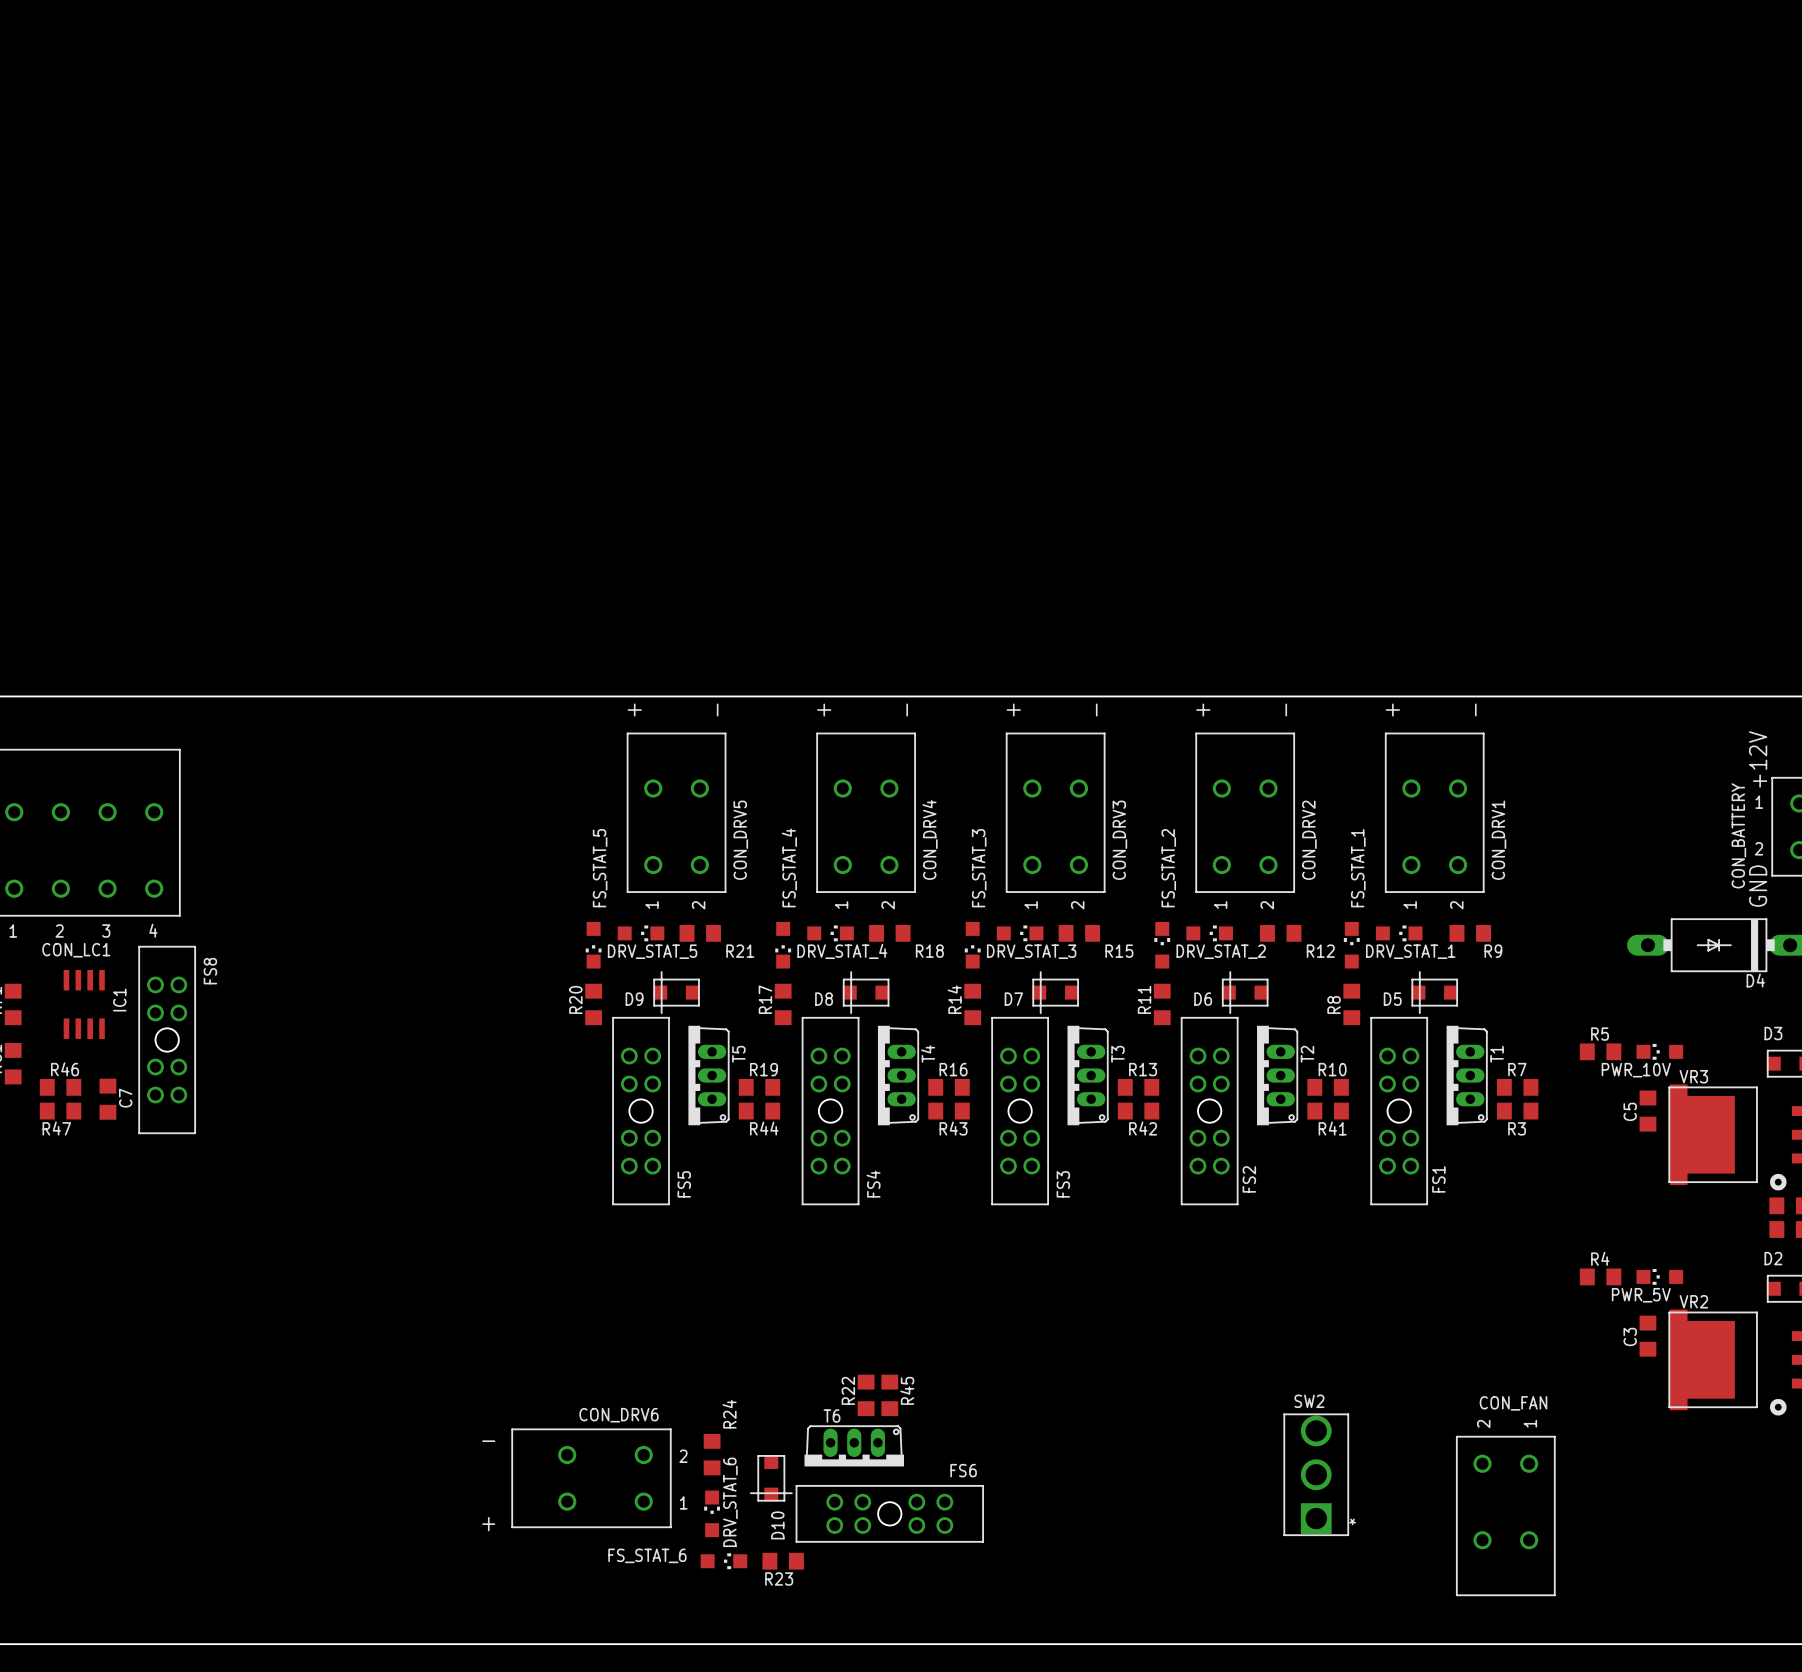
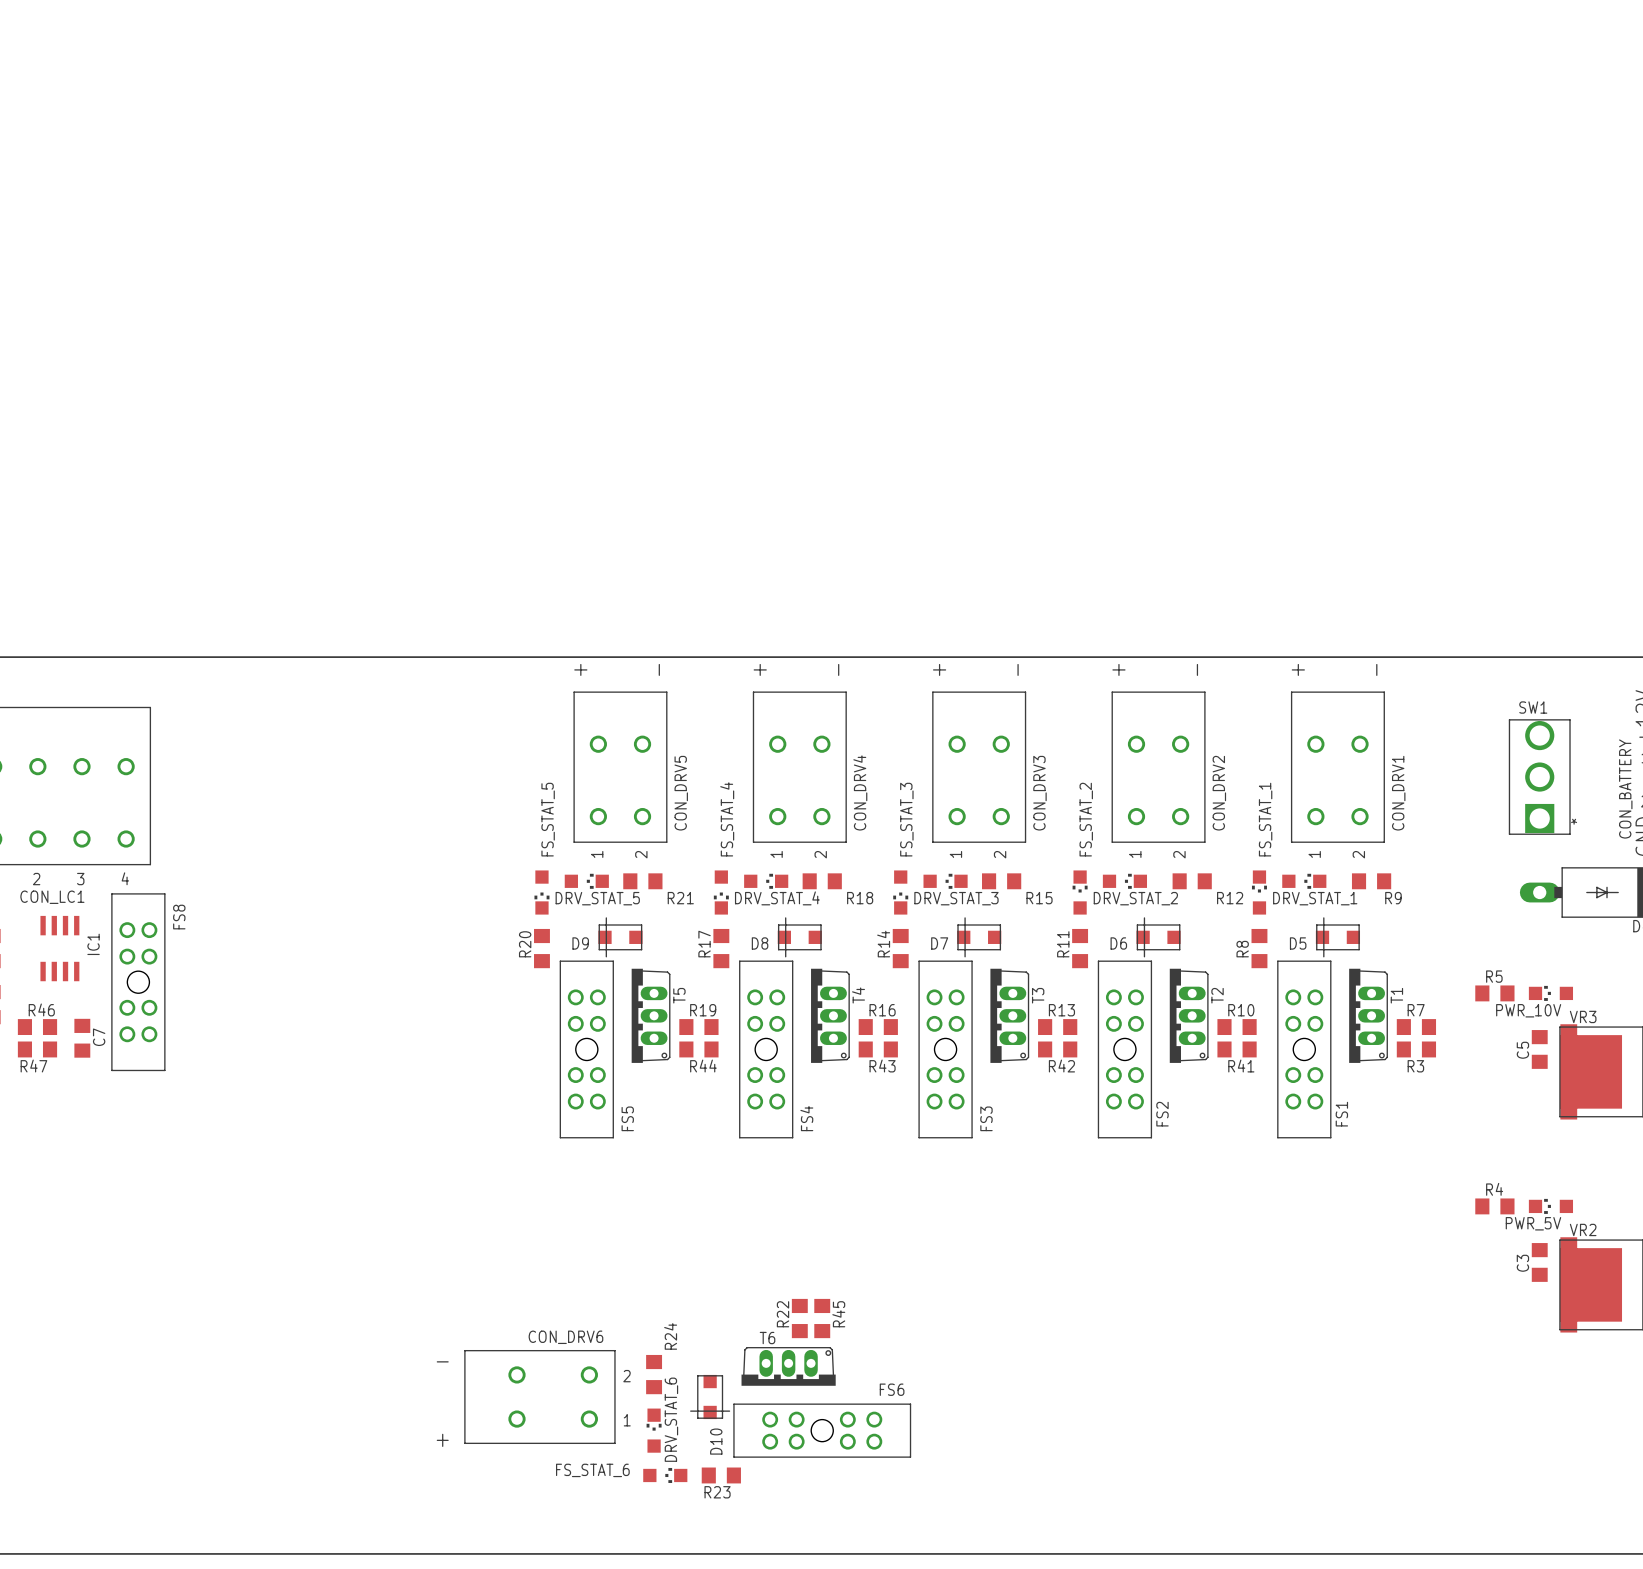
SW1: none -> (1539, 777)
SW2: (1316, 1474) -> none
CON_FAN: (1505, 1515) -> none

